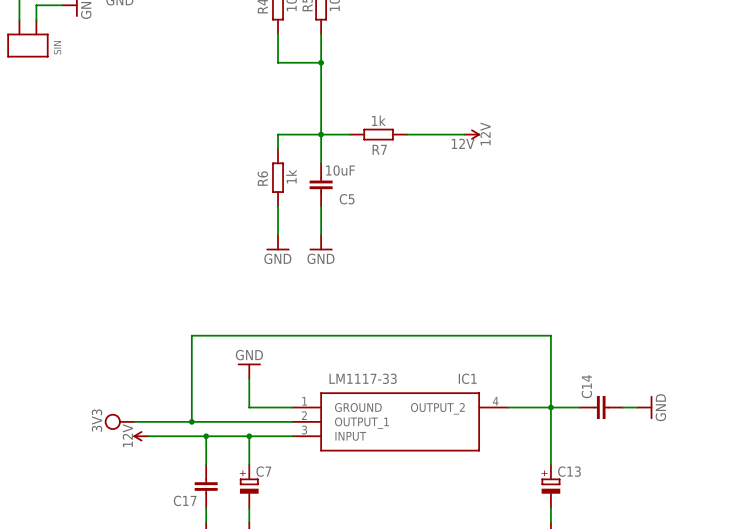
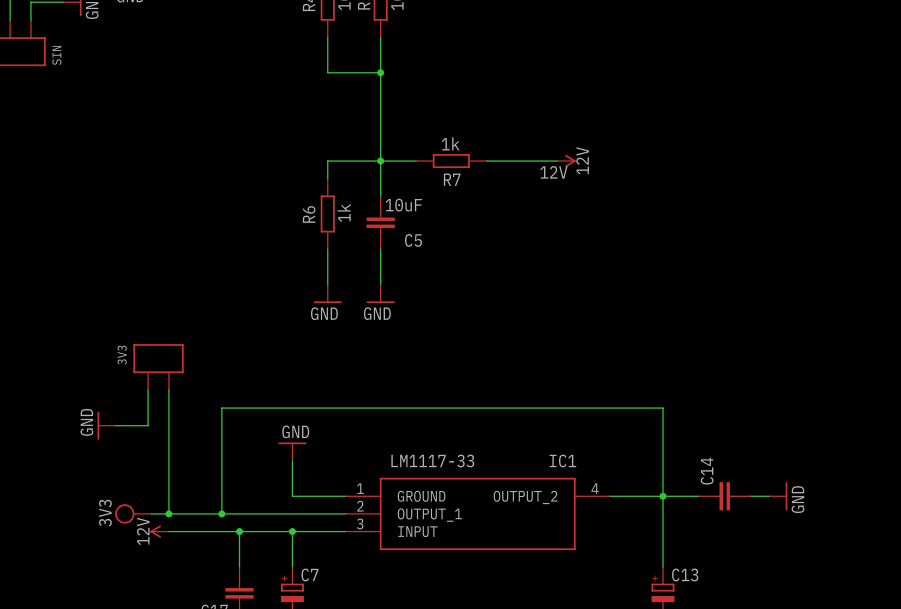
3V3: none -> (158, 366)
wire: none -> (148, 389) (148, 425) (115, 425)
wire: none -> (168, 389) (168, 513)
power symbol: none -> GND (106, 425)
junction: none -> (168, 513)

